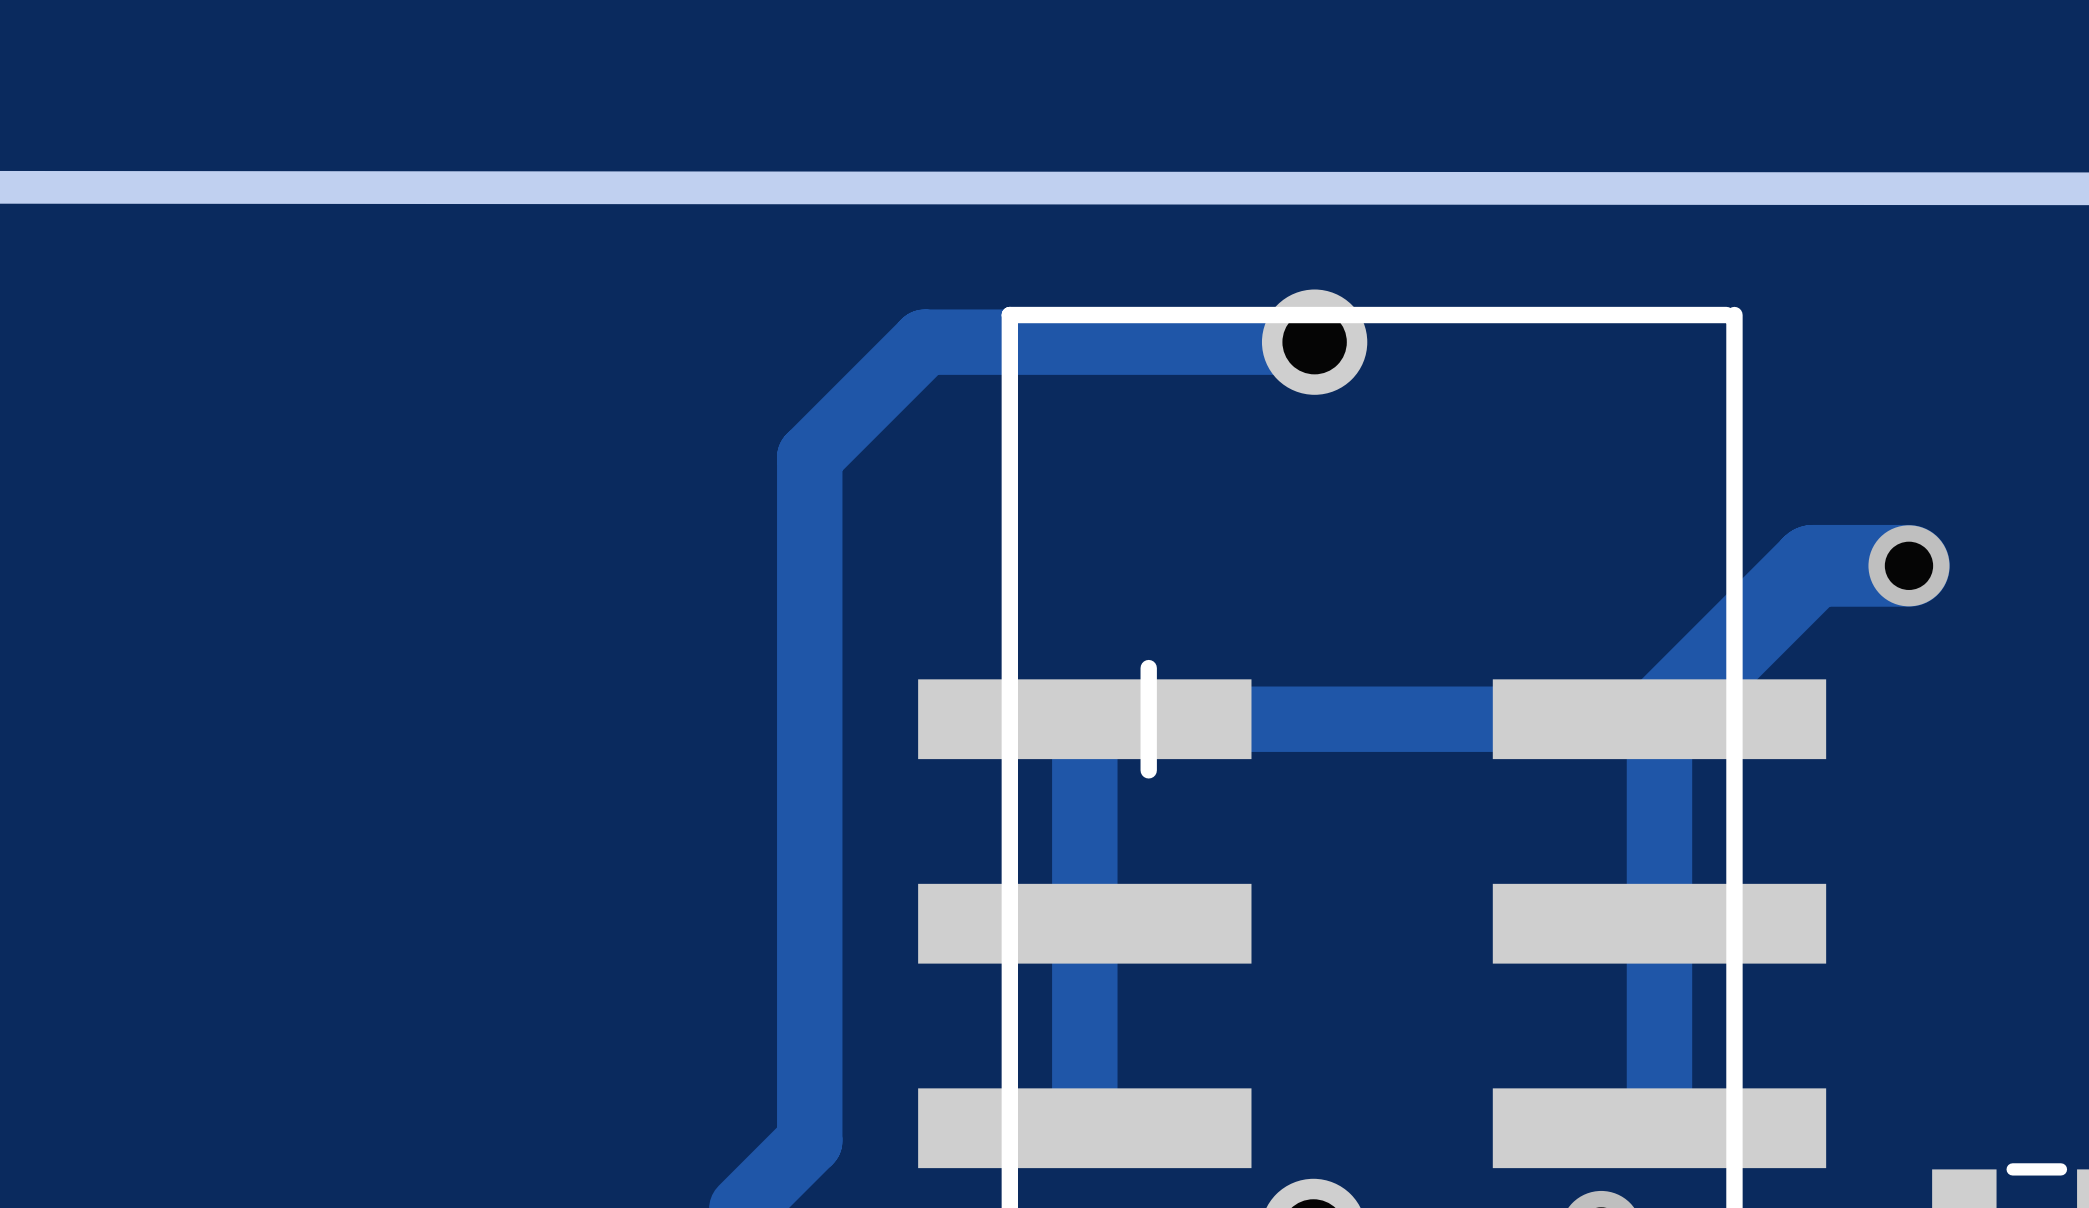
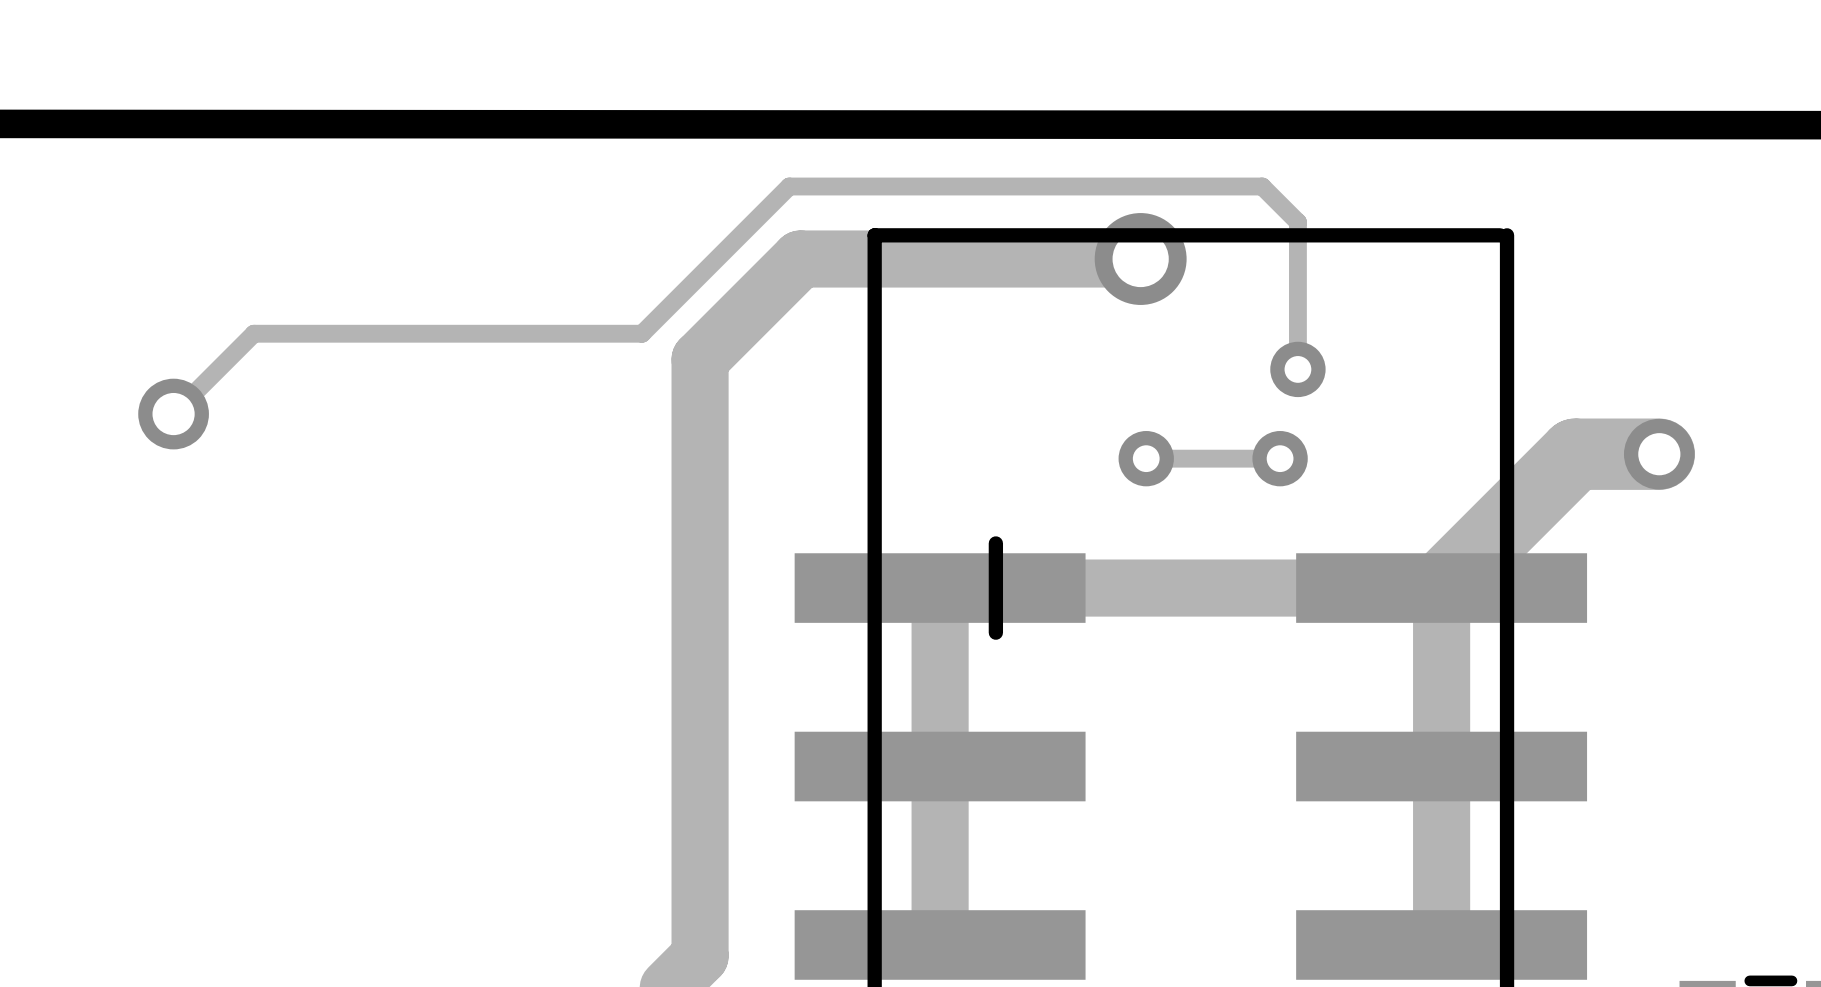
track: none -> (1297, 369) (1297, 222) (1262, 186) (789, 186) (642, 333) (253, 333) (173, 414)
via: none -> (1297, 369)
via: none -> (173, 414)
via: none -> (1146, 458)
track: none -> (1280, 458) (1146, 458)
via: none -> (1280, 458)

